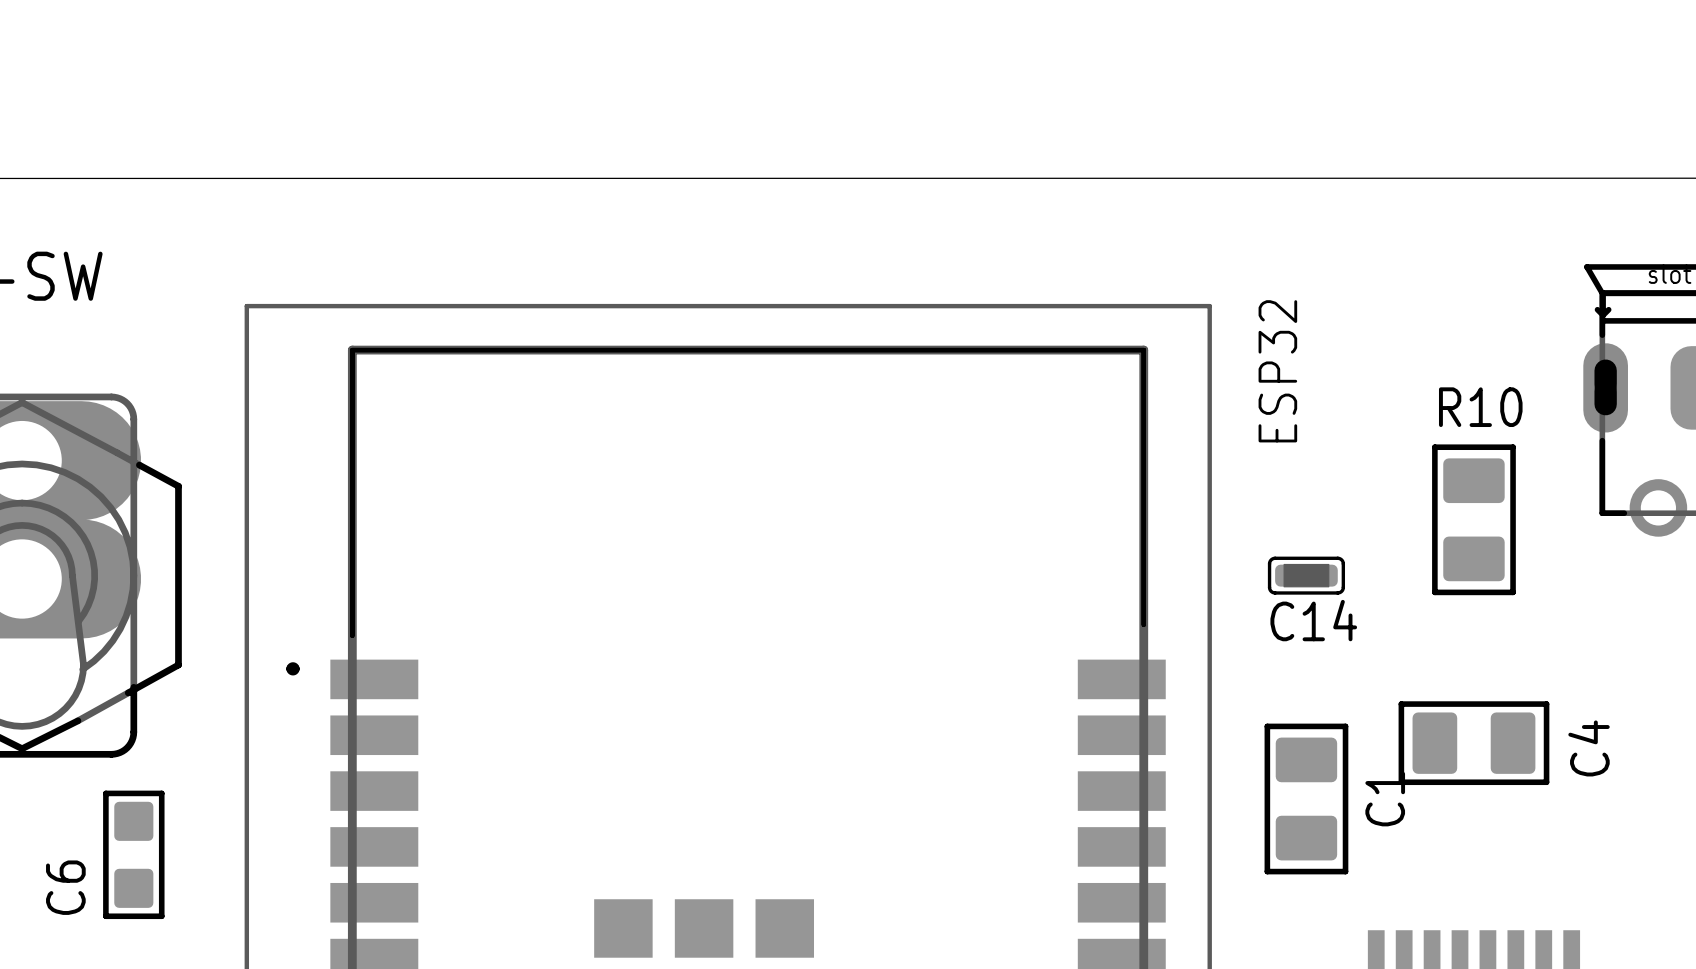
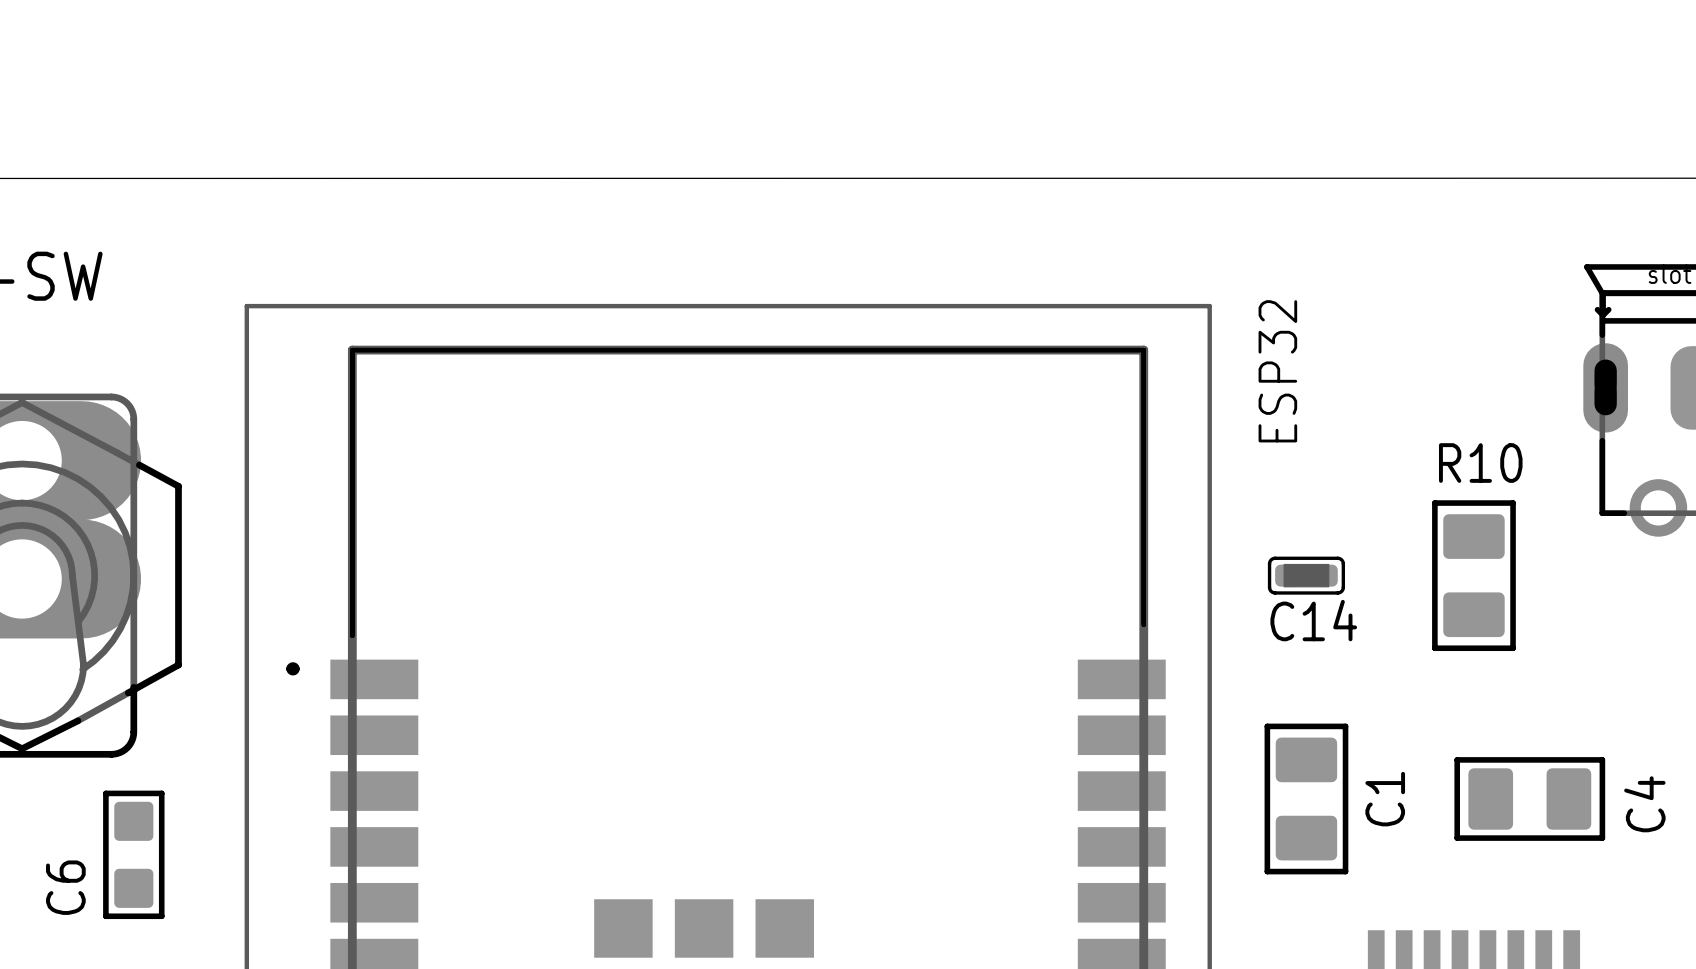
R10 position: (1473, 519) -> (1473, 575)
C4 position: (1473, 743) -> (1529, 798)

